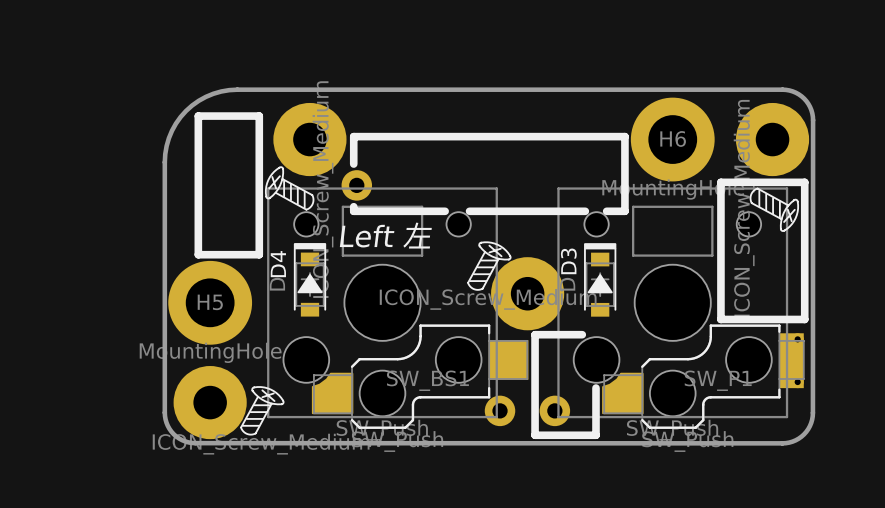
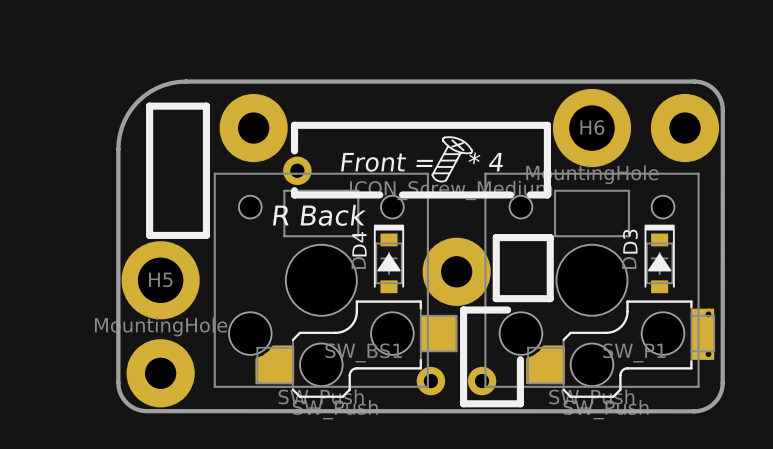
drawing: [264, 166, 315, 211] -> none
text: none -> Front = * 4 (421, 162)
line: (720, 182) (804, 182) (804, 319) (720, 319) (720, 182) -> none
drawing: [749, 187, 800, 232] -> none
text: Left 左 (385, 235) -> R Back (319, 215)
line: none -> (496, 237) (550, 237) (550, 298) (496, 298) (496, 237)
drawing position: (489, 266) -> (452, 159)
D4 position: (310, 279) -> (389, 258)
D3 position: (600, 279) -> (659, 258)
drawing: [240, 386, 285, 436] -> none

